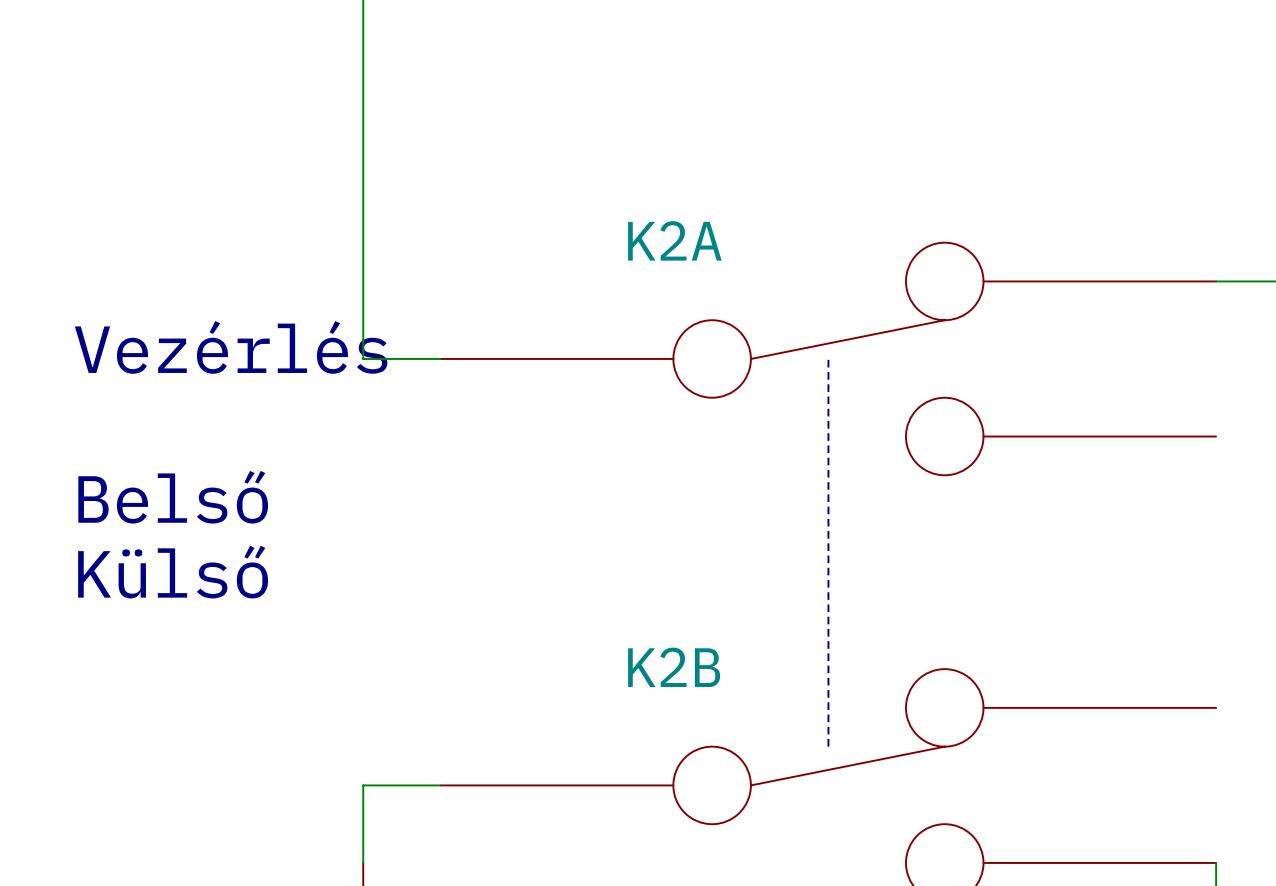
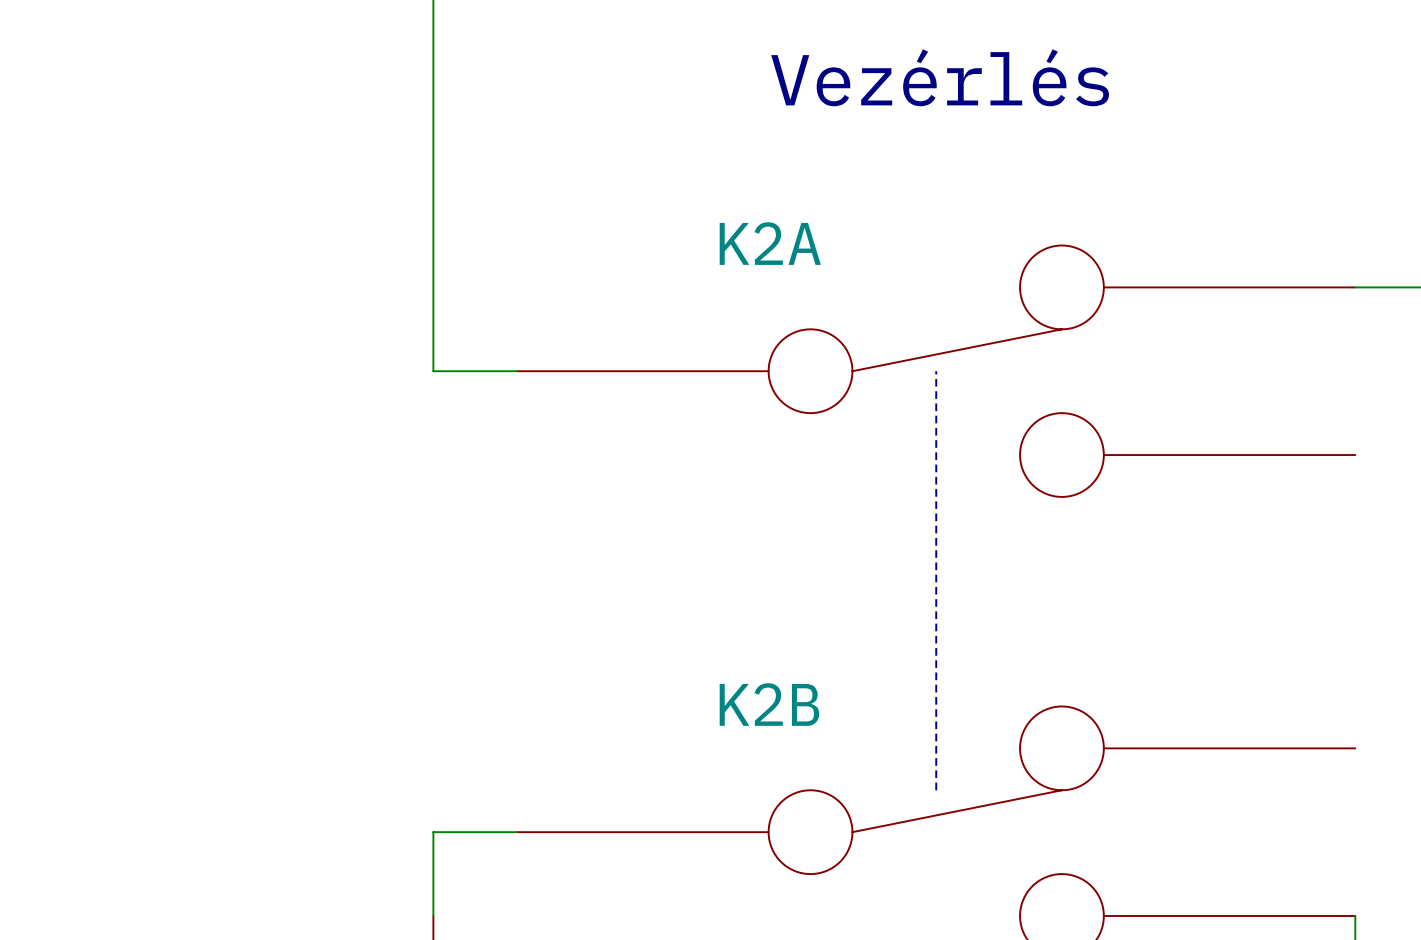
text position: Vezérlés (231, 347) -> Vezérlés (940, 77)
text: Belső (173, 497) -> none
text: Külső (173, 572) -> none

